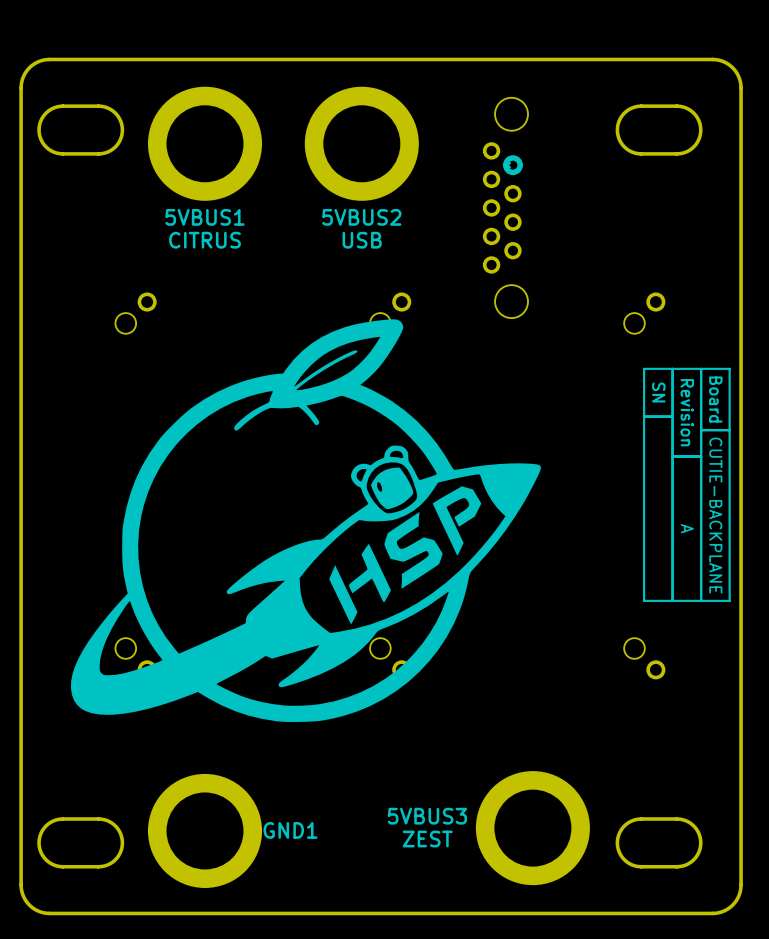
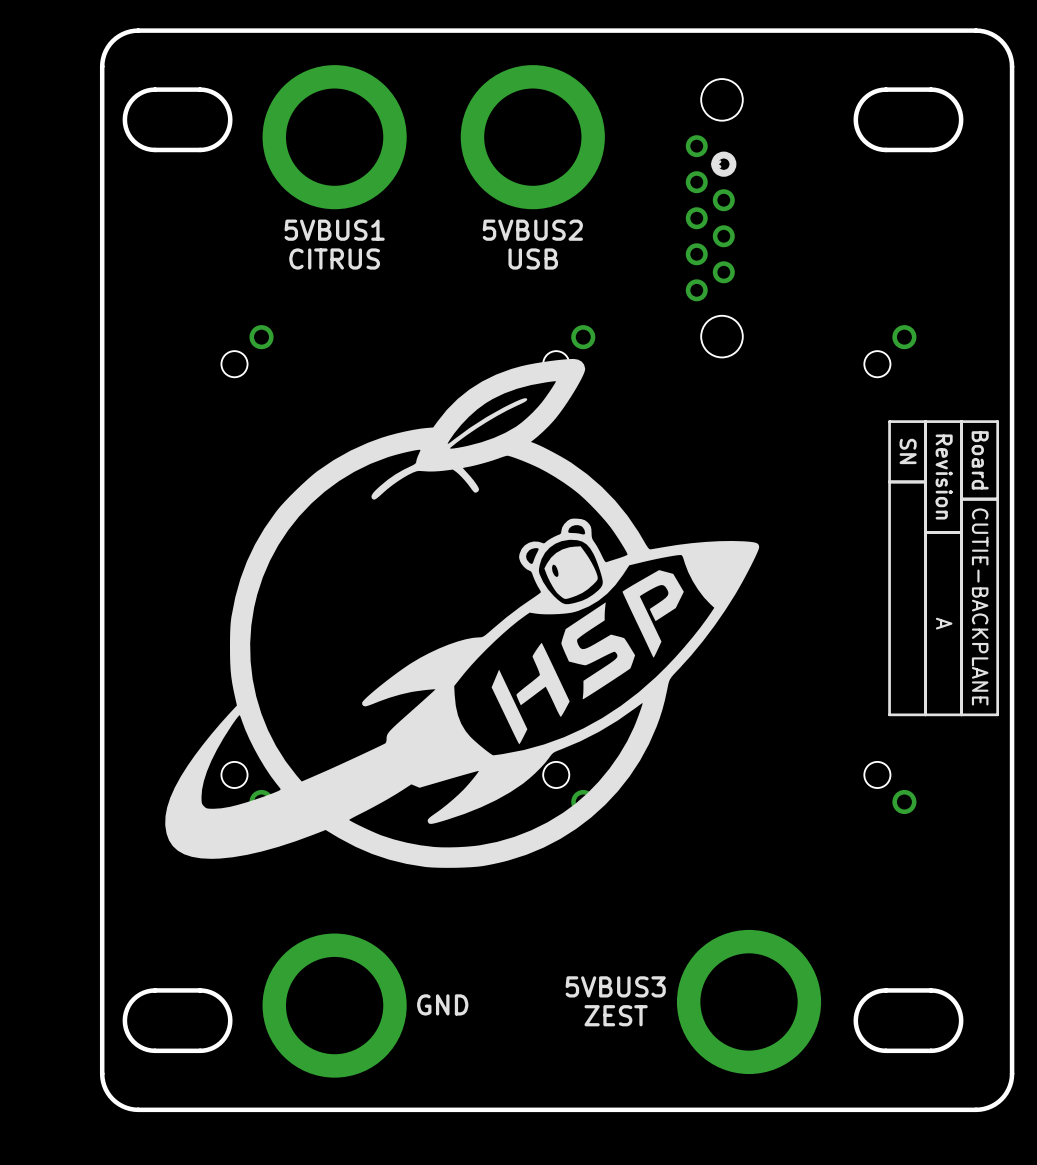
GND1 name: GND1 (290, 830) -> GND (442, 1004)

